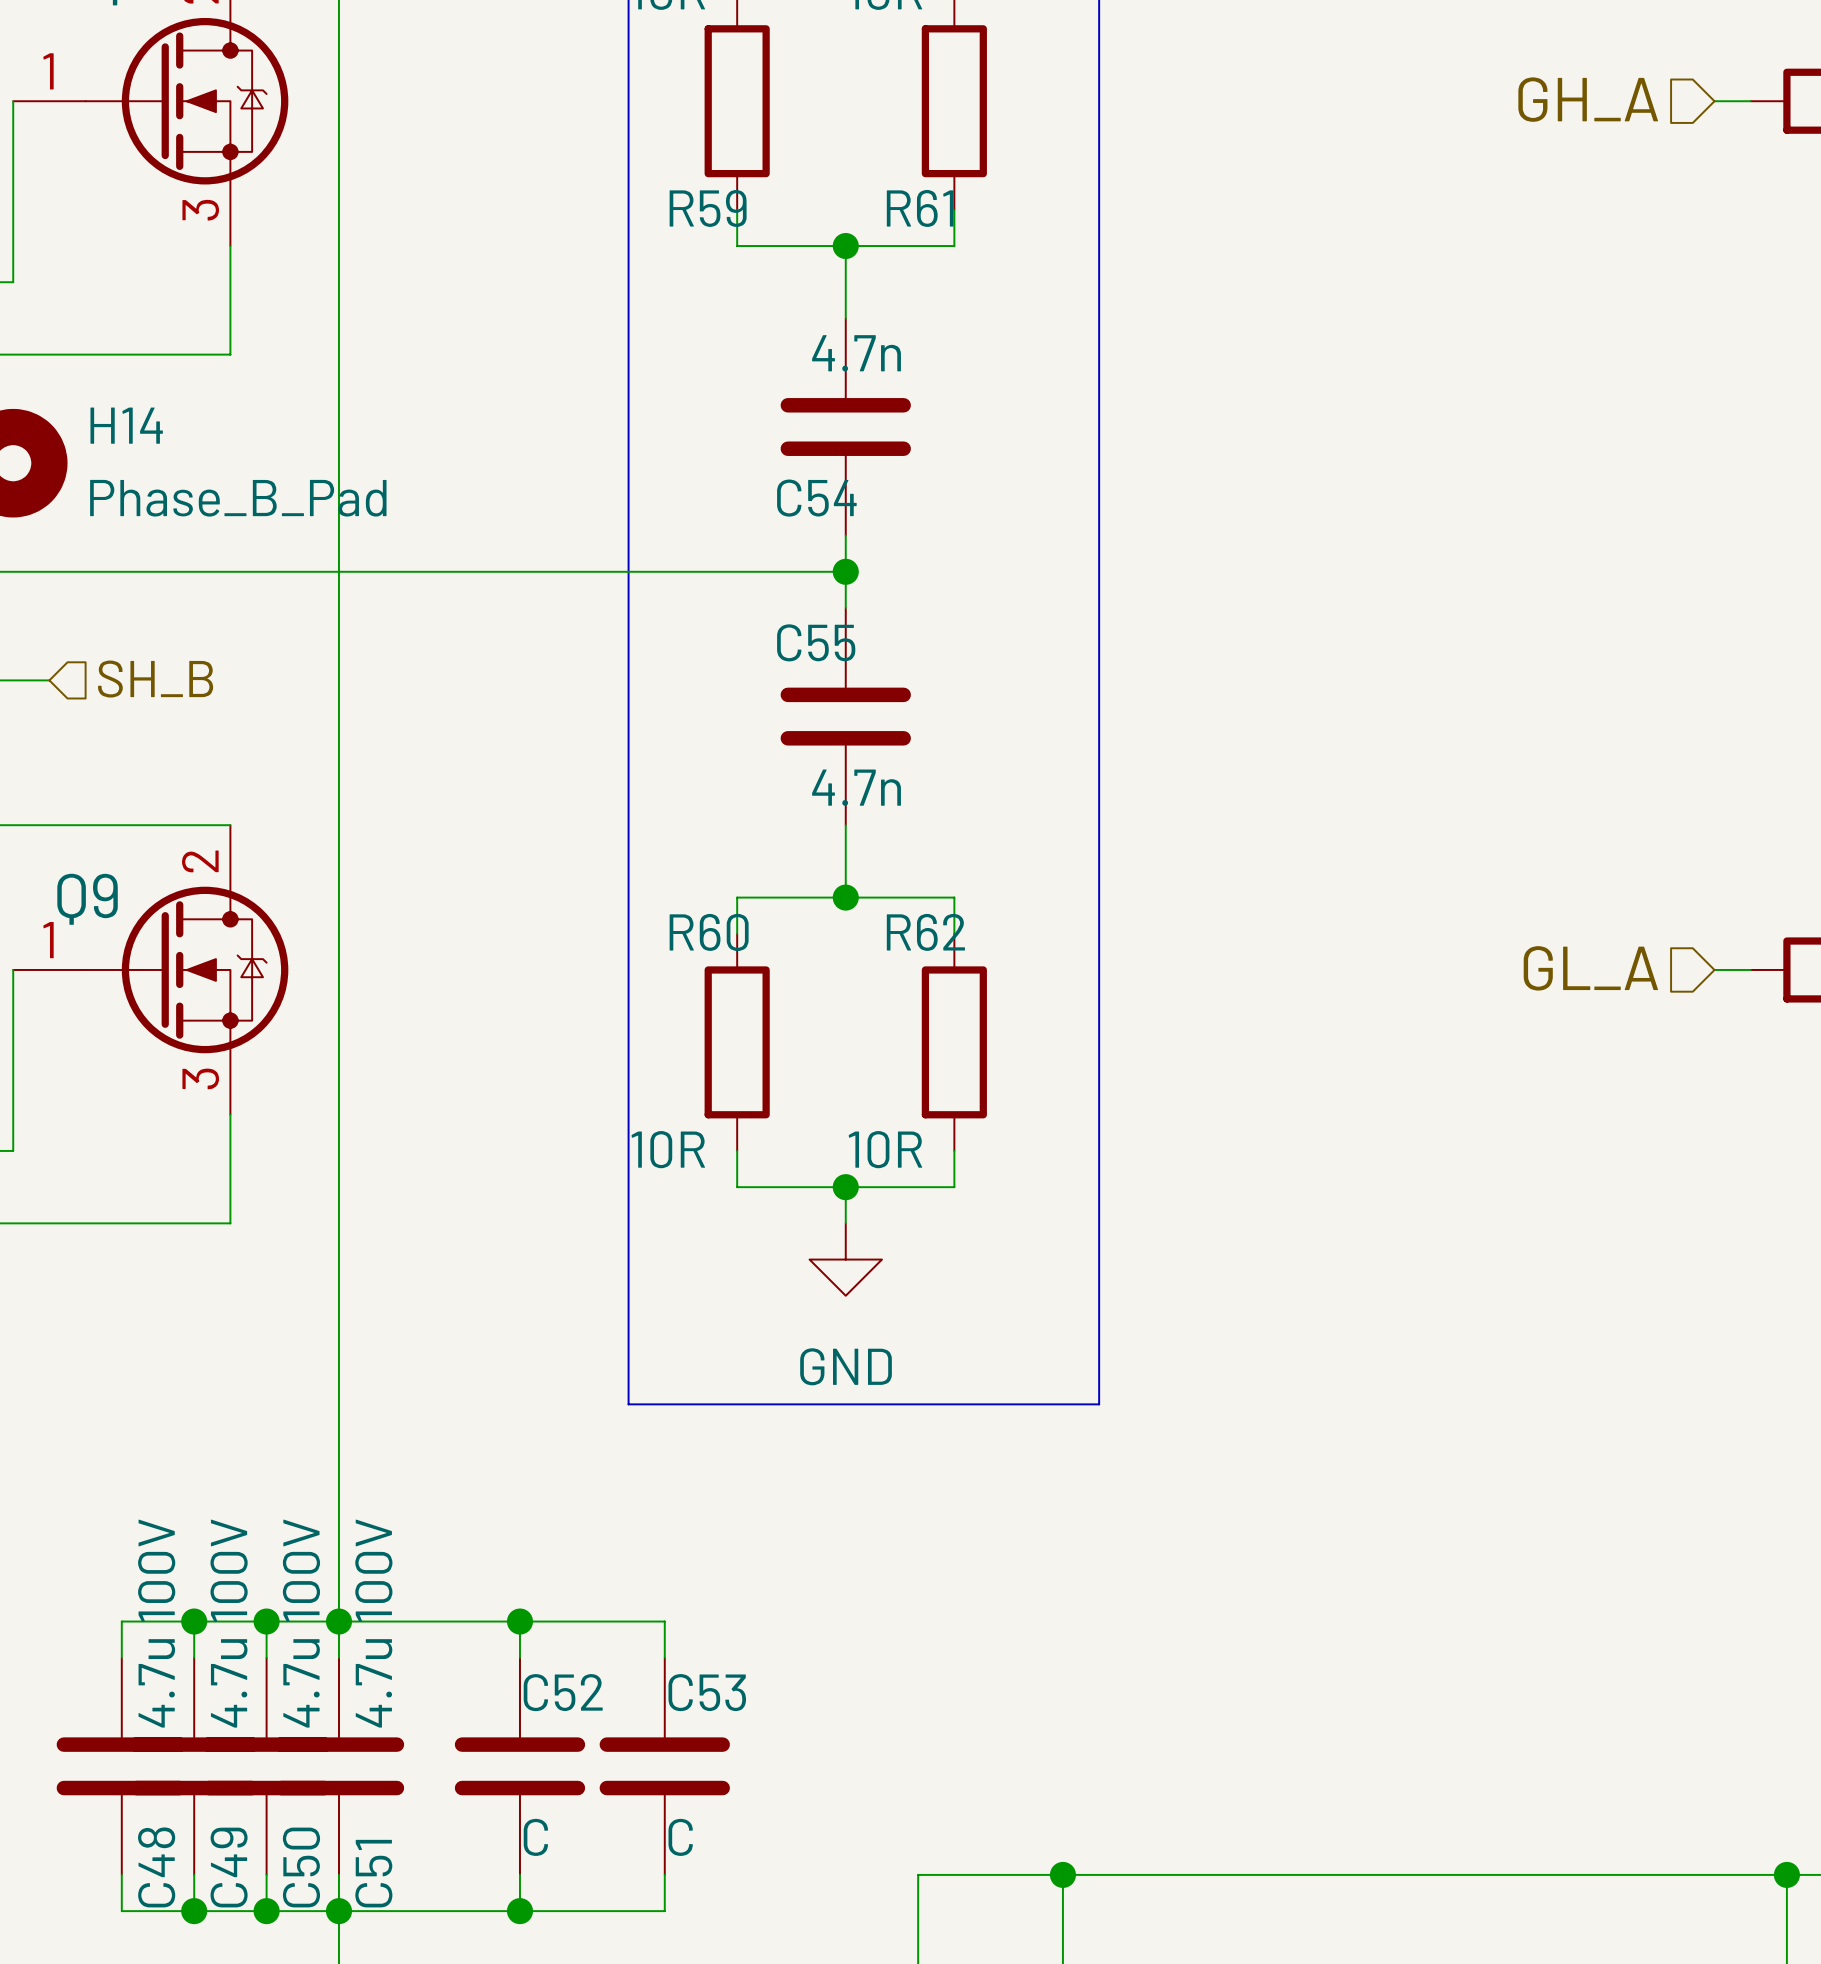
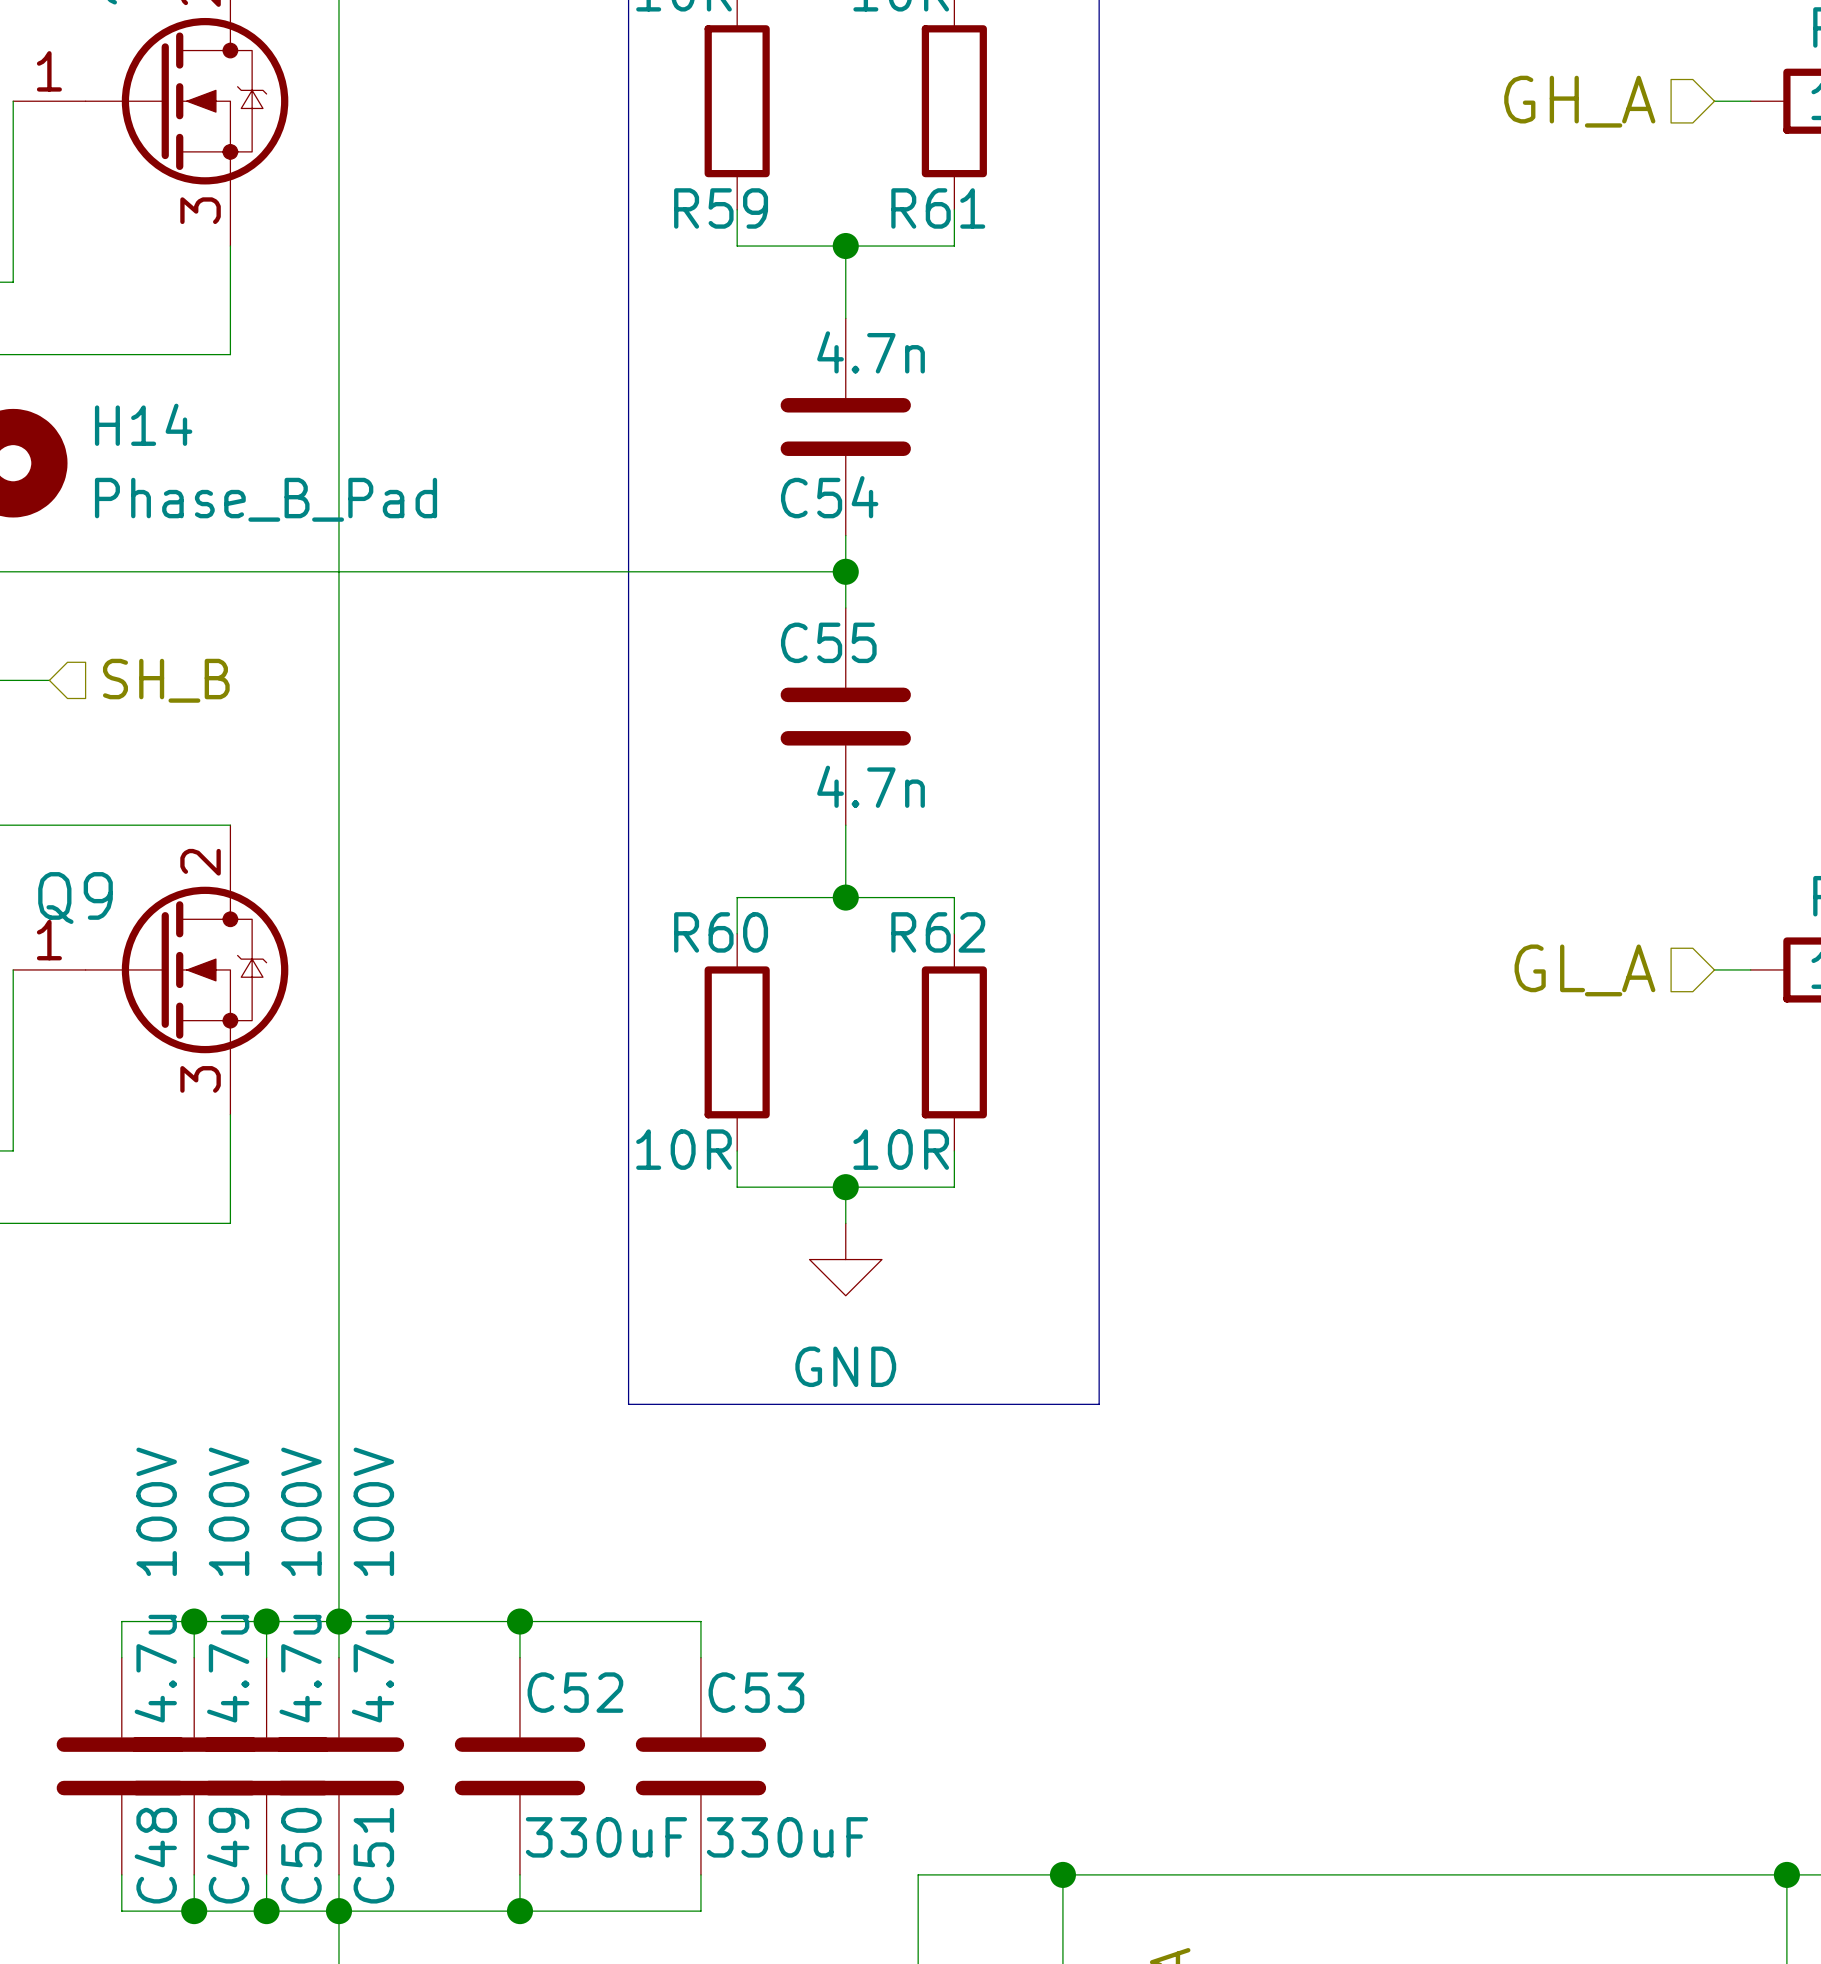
wire: (664, 1621) (664, 1657) -> (664, 1621) (700, 1621) (700, 1657)
C53 position: (664, 1766) -> (700, 1766)
C52 value: C (535, 1837) -> 330uF (606, 1837)
C53 value: C (680, 1837) -> 330uF (787, 1837)
wire: (664, 1874) (664, 1911) -> (700, 1874) (700, 1911) (664, 1911)

